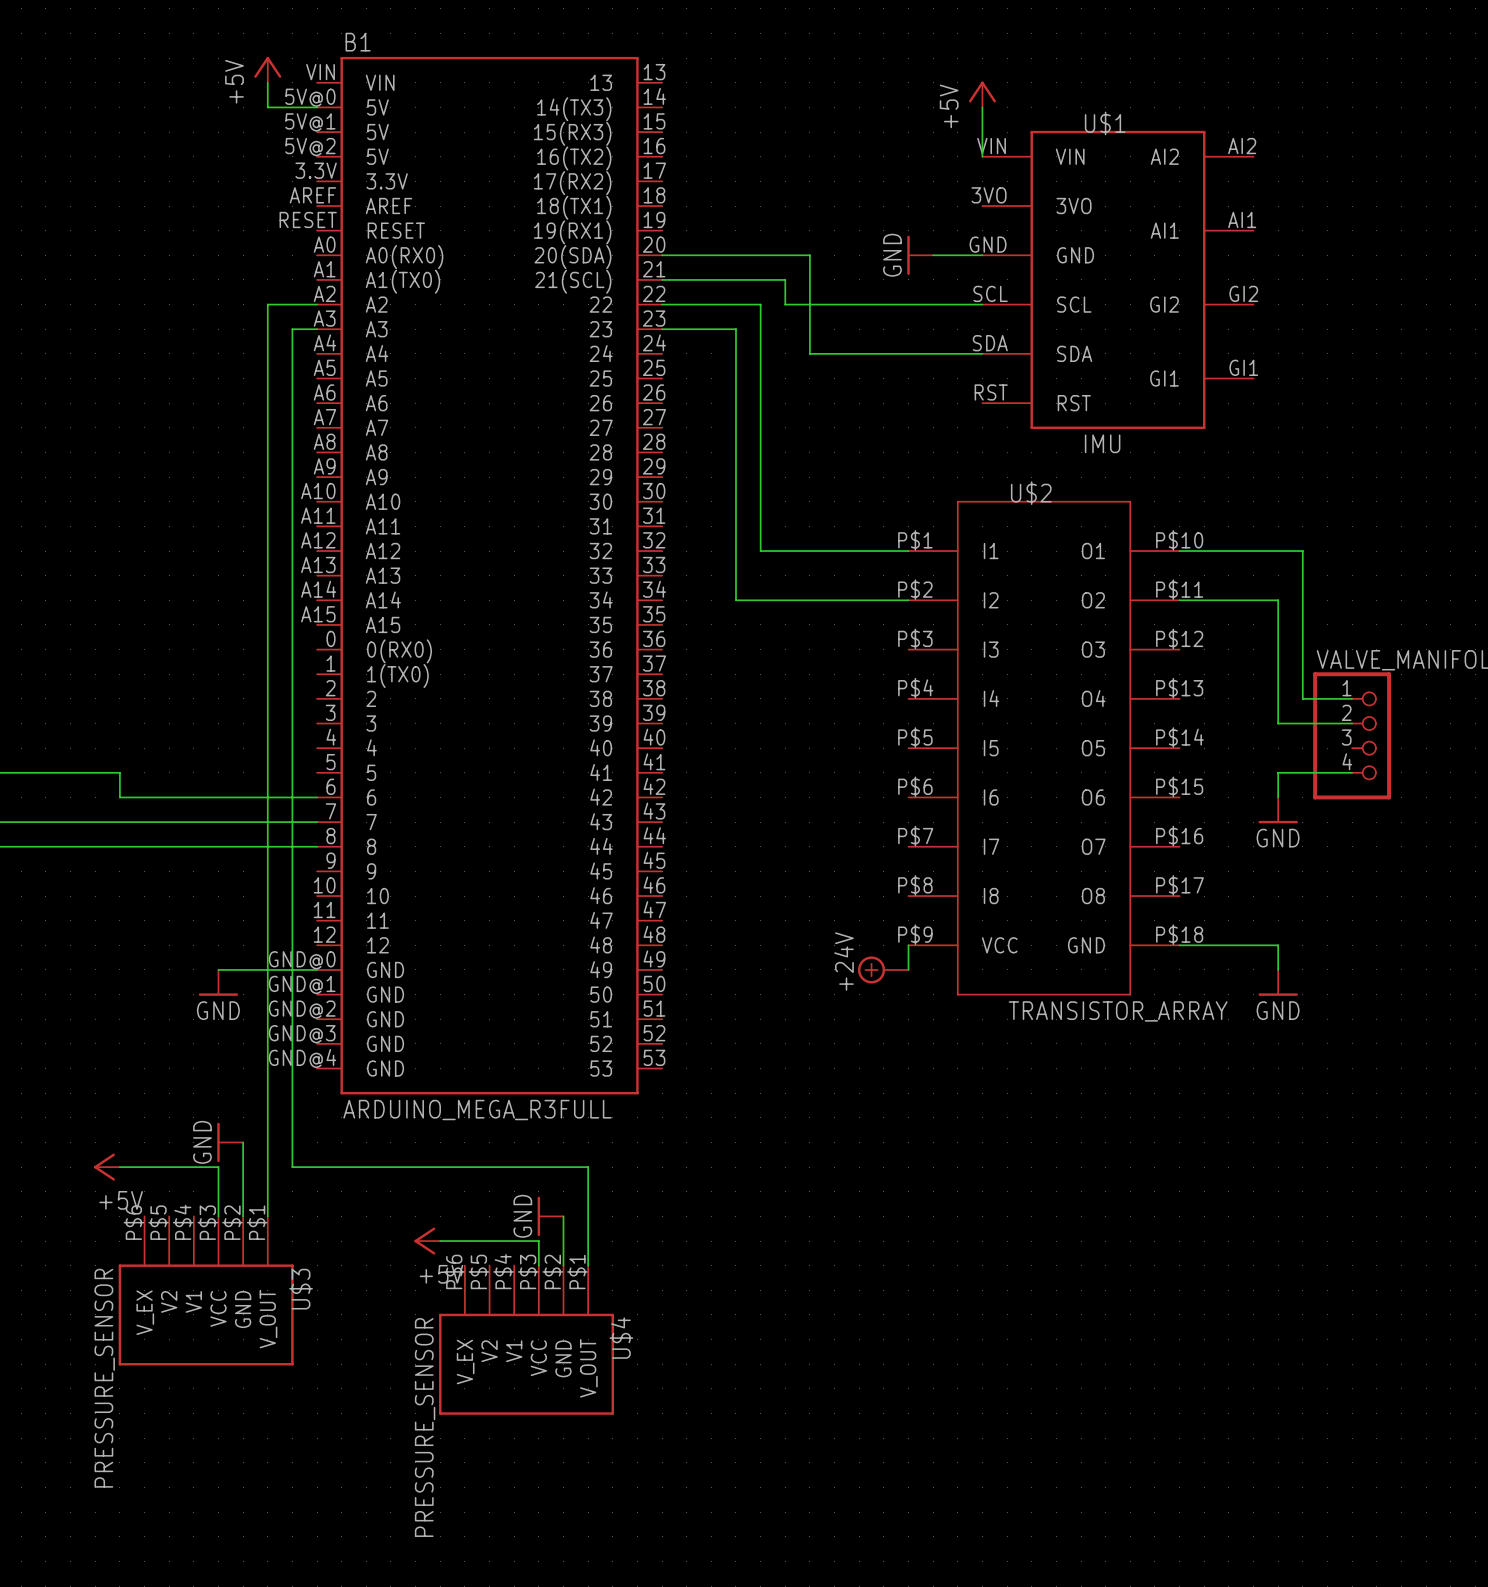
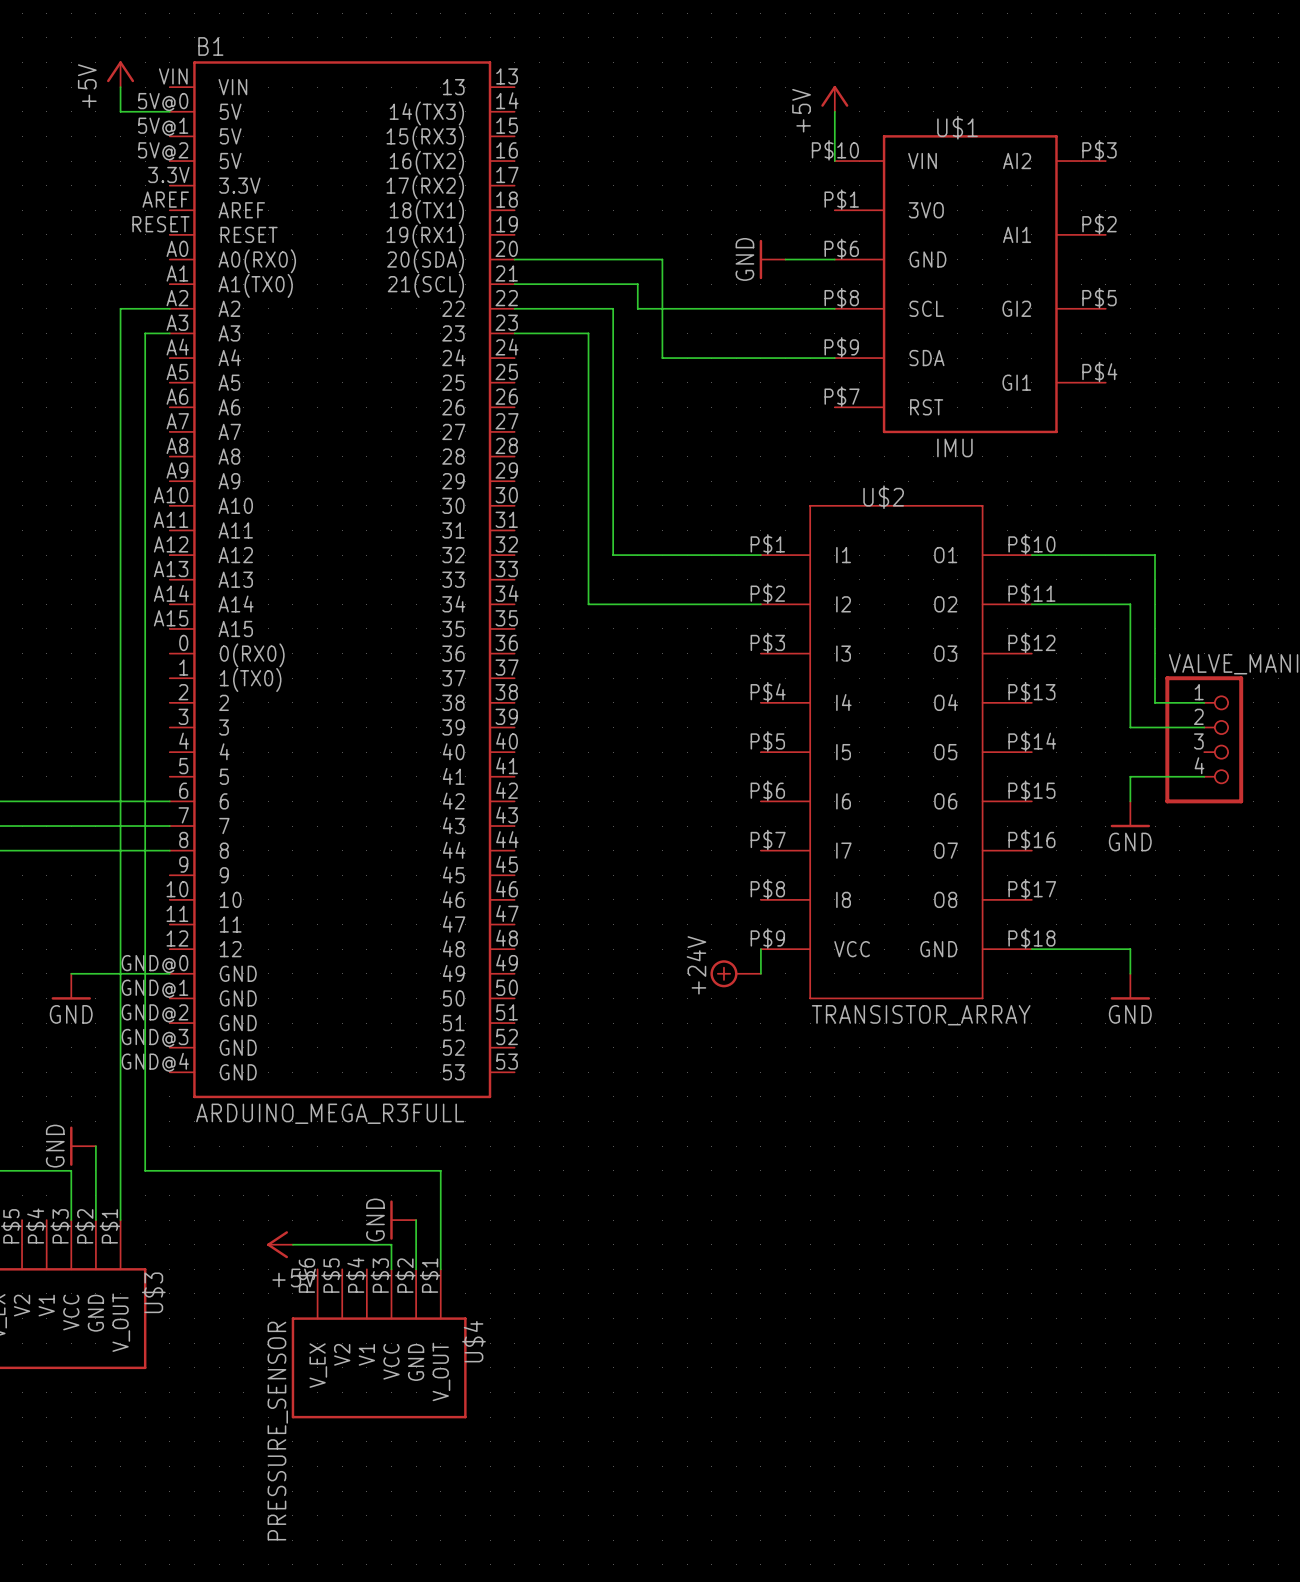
U$1 symbol: [982, 130, 1254, 430] -> [834, 135, 1106, 434]
U$2 value position: TRANSISTOR_ARRAY (1118, 1011) -> TRANSISTOR_ARRAY (921, 1015)

